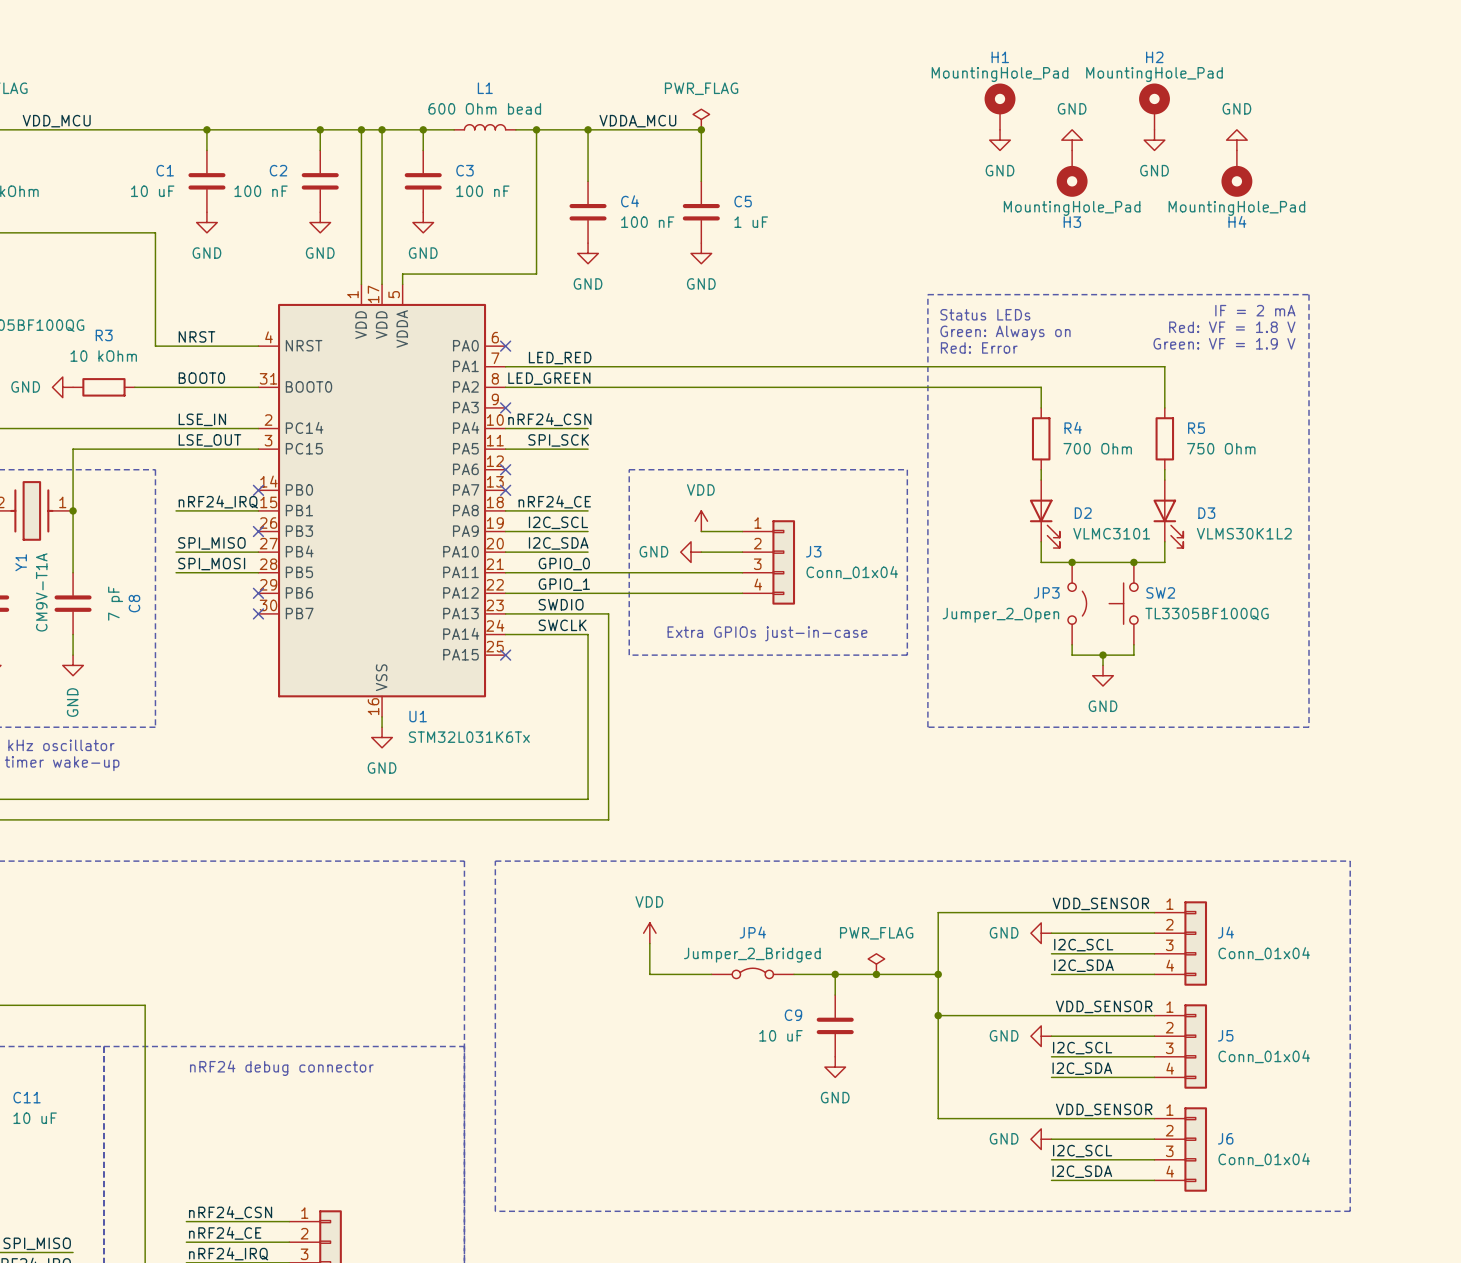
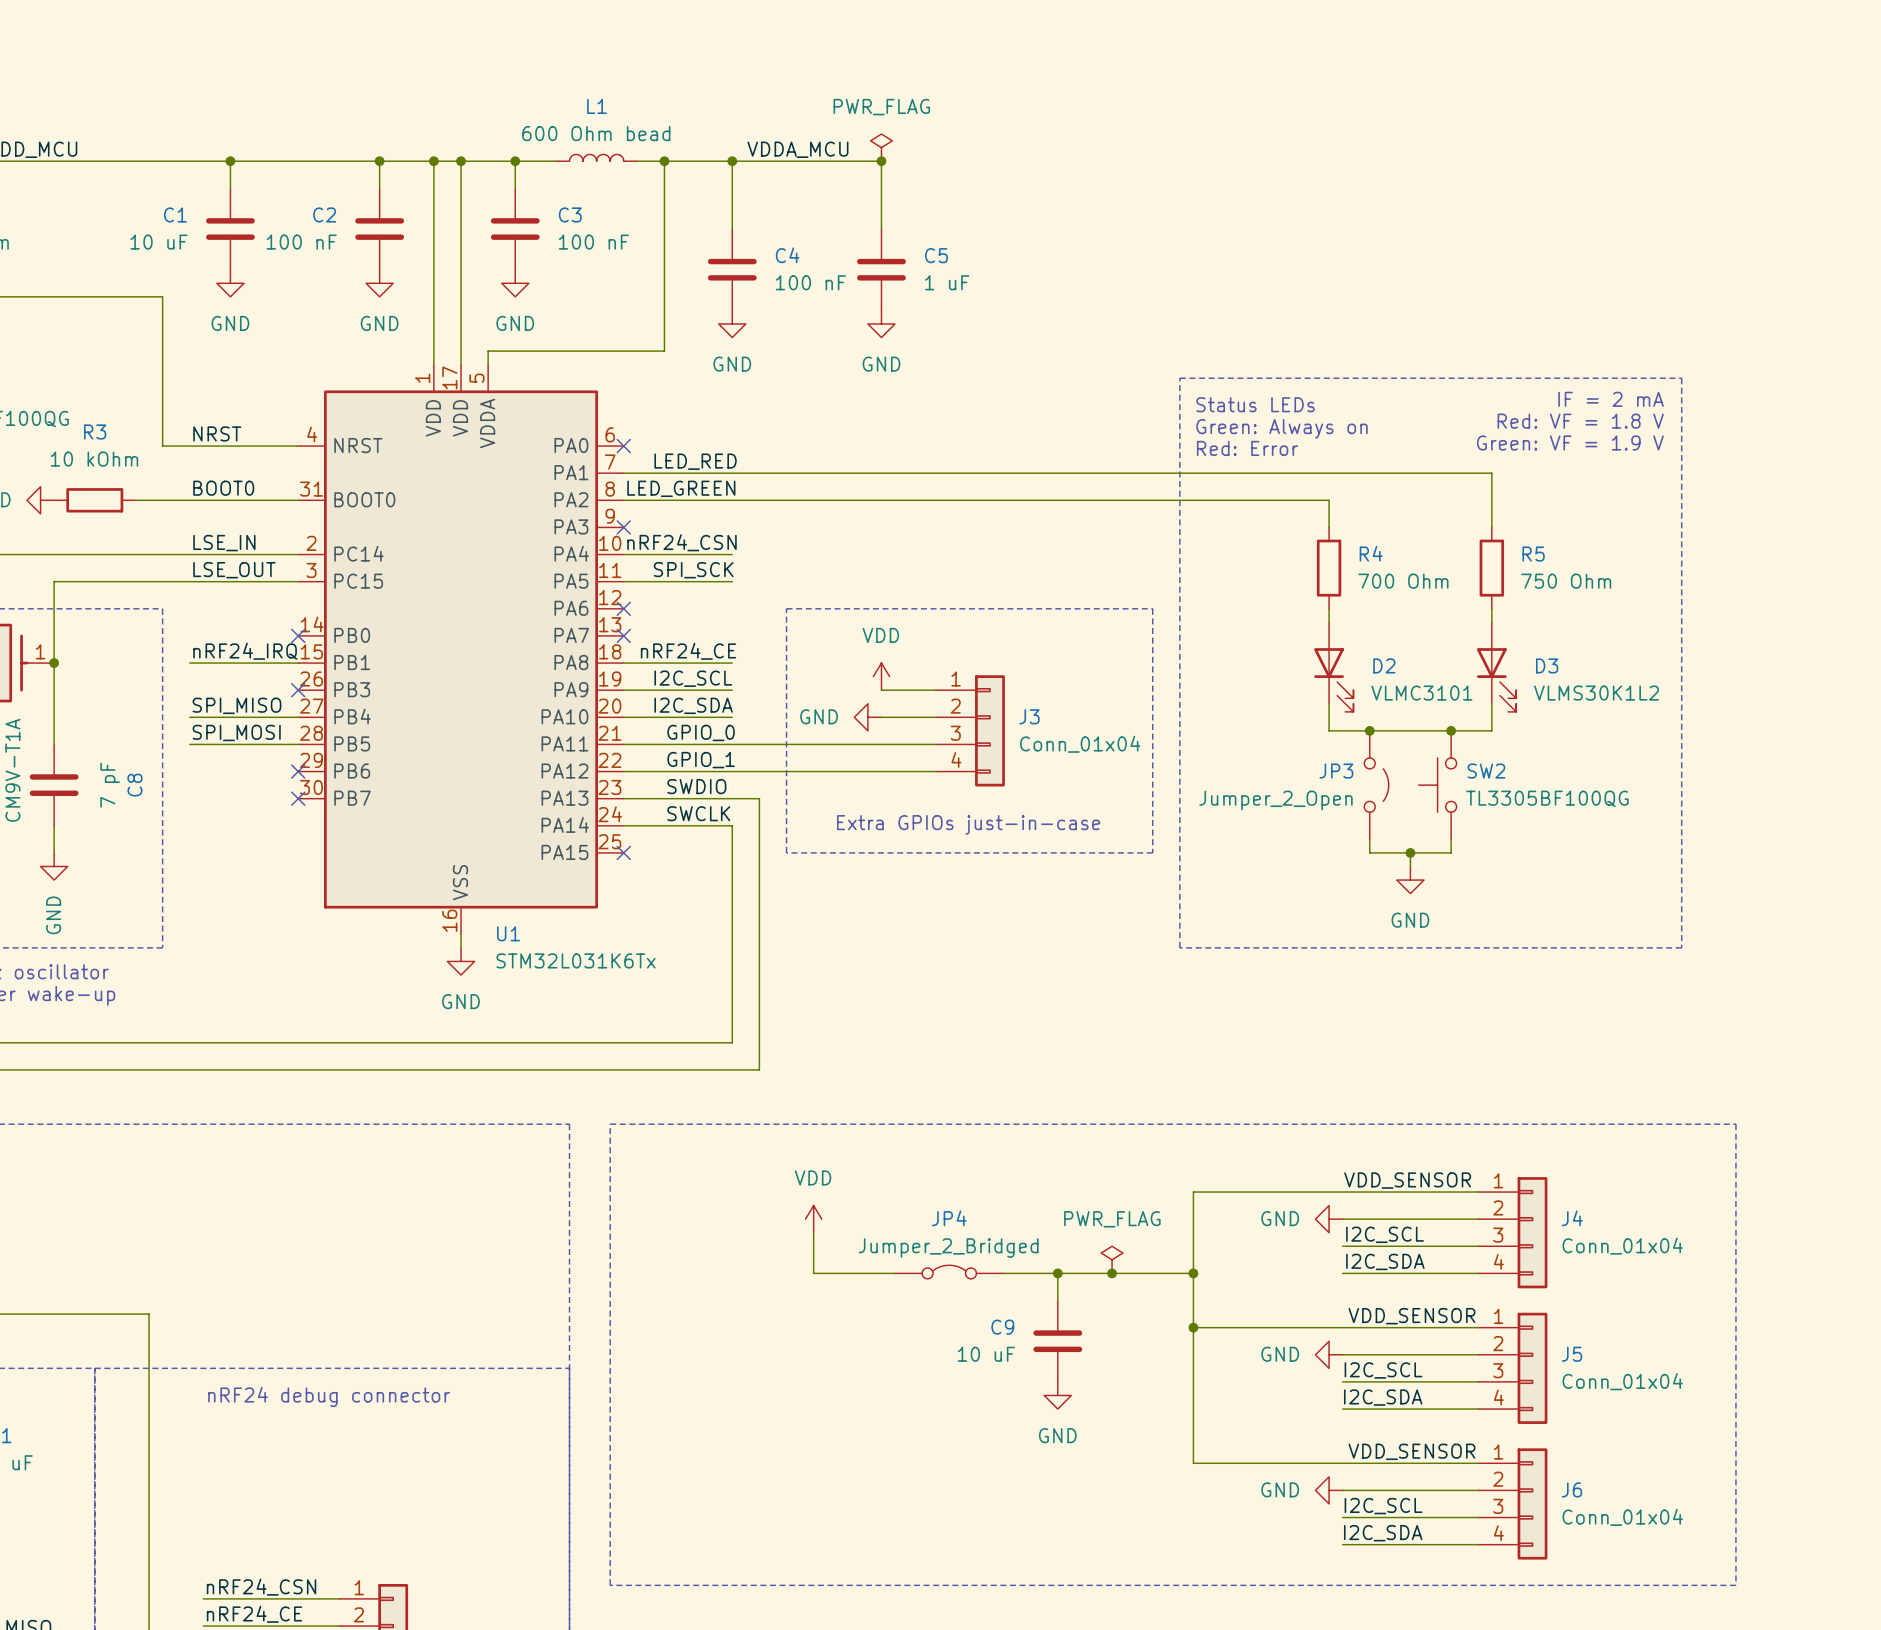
H1: MountingHole_Pad (1000, 106) -> none
H2: MountingHole_Pad (1154, 106) -> none
power symbol: GND (1000, 140) -> none
power symbol: GND (1072, 140) -> none
power symbol: GND (1154, 140) -> none
power symbol: GND (1236, 140) -> none
H3: MountingHole_Pad (1072, 173) -> none
H4: MountingHole_Pad (1236, 173) -> none

